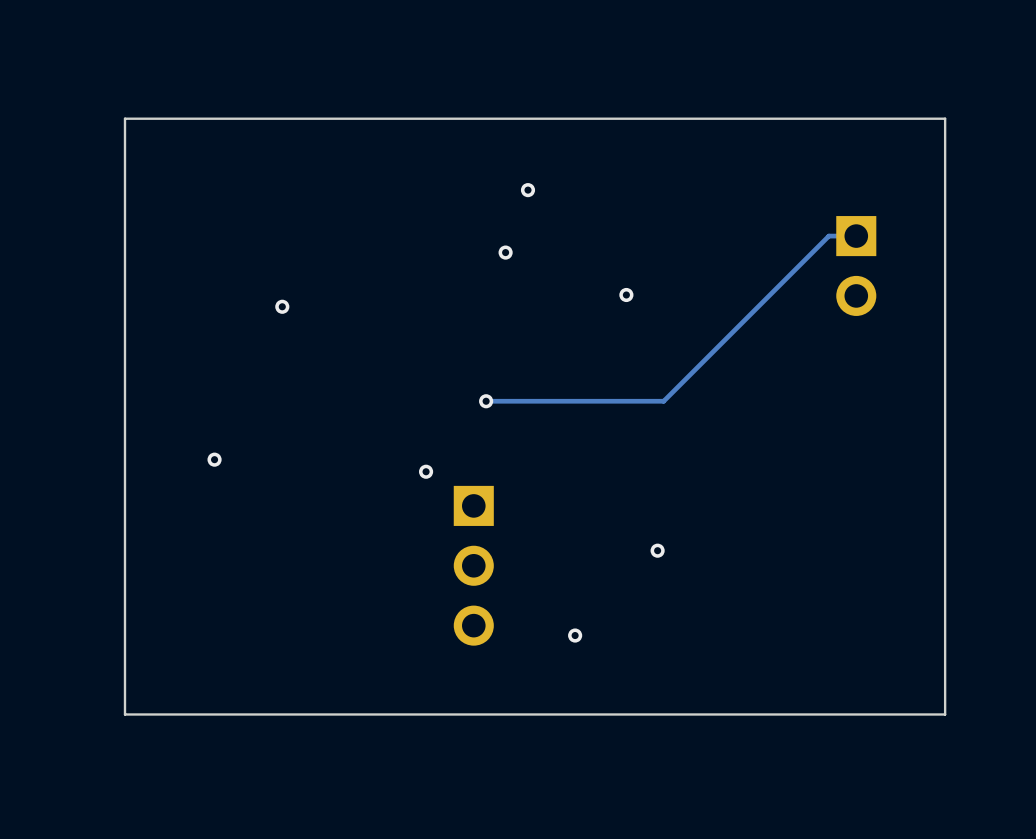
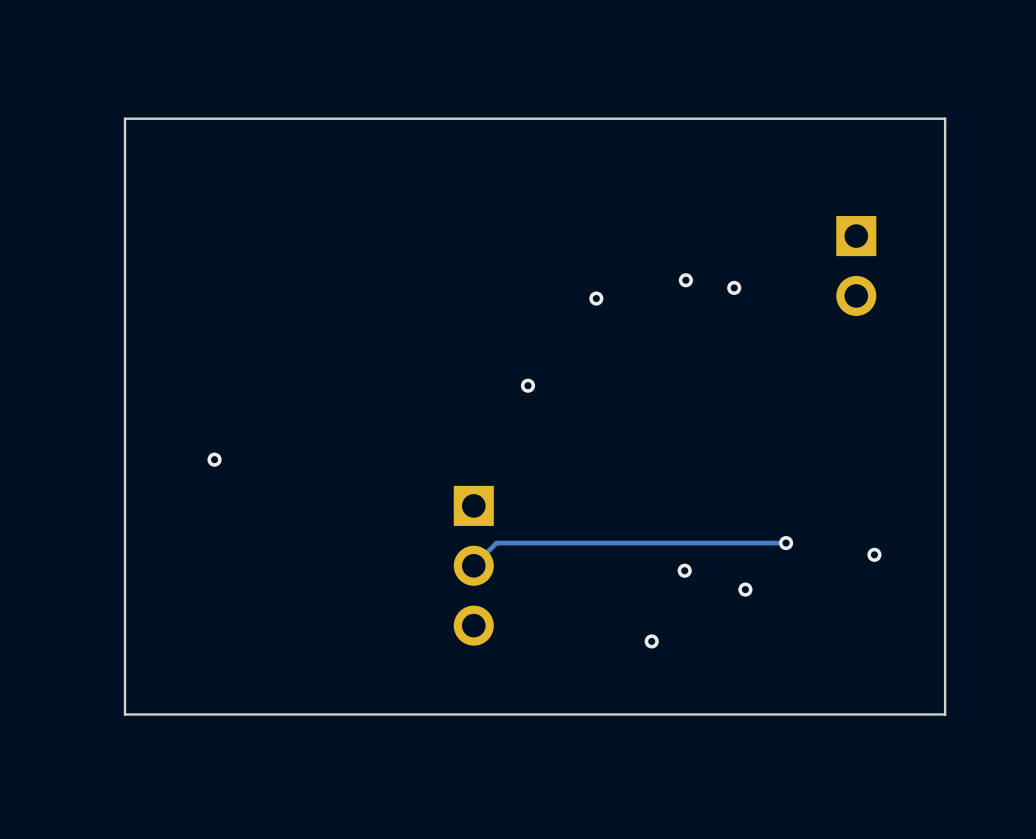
via: (527, 190) -> none
track: (856, 236) (828, 236) (663, 401) (486, 401) -> none
via: (505, 252) -> none
via: none -> (685, 280)
via: none -> (734, 287)
via position: (626, 294) -> (596, 298)
via: (282, 306) -> none
via position: (486, 401) -> (527, 385)
via: (426, 471) -> none
track: none -> (786, 543) (496, 543) (473, 565)
via: none -> (786, 543)
via position: (657, 550) -> (684, 570)
via: none -> (874, 554)
via: none -> (745, 589)
via: (575, 635) -> none
via: none -> (651, 641)

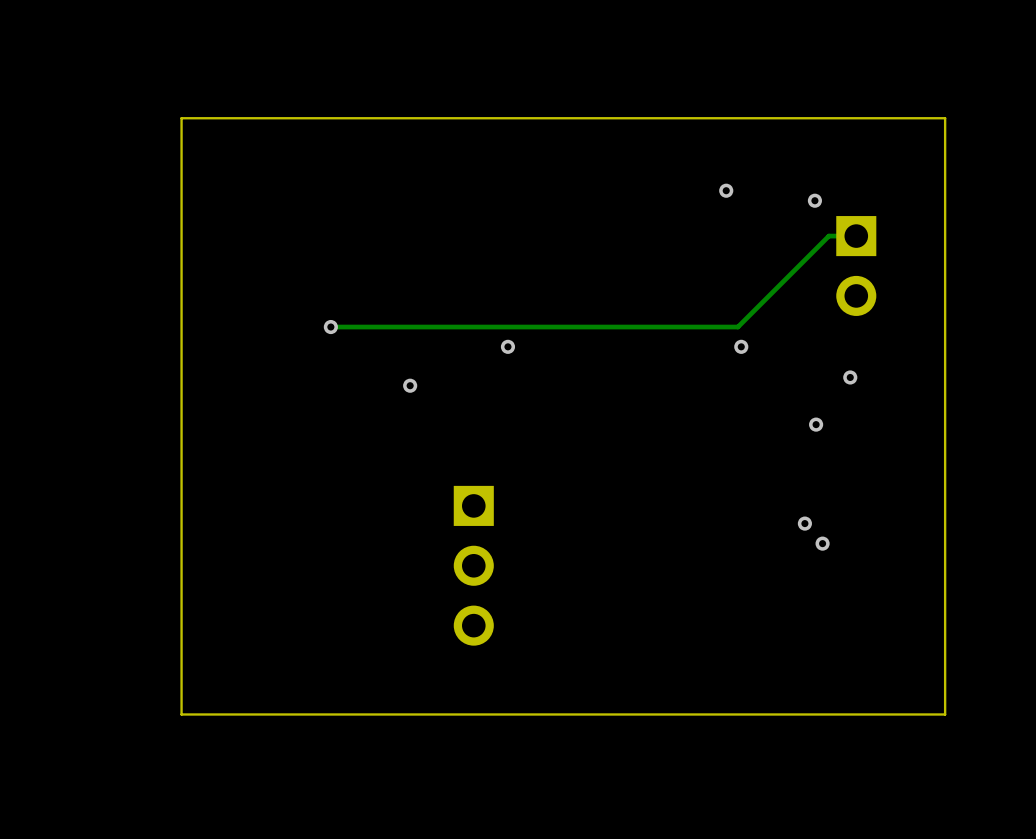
board edge: (945, 118) (124, 118) (124, 714) (181, 714) -> (945, 118) (181, 118) (181, 714)
via: none -> (726, 190)
via: none -> (814, 200)
track: none -> (856, 236) (828, 236) (737, 327) (330, 327)
via: (685, 280) -> none
via: (734, 287) -> none
via: (596, 298) -> none
via: none -> (330, 327)
via: none -> (741, 346)
via: none -> (850, 377)
via: none -> (410, 385)
via position: (527, 385) -> (507, 346)
via: none -> (816, 424)
via: (214, 459) -> none
via: none -> (804, 523)
track: (786, 543) (496, 543) (473, 565) -> none
via: (786, 543) -> none
via: none -> (822, 543)
via: (874, 554) -> none
via: (684, 570) -> none
via: (745, 589) -> none
via: (651, 641) -> none

